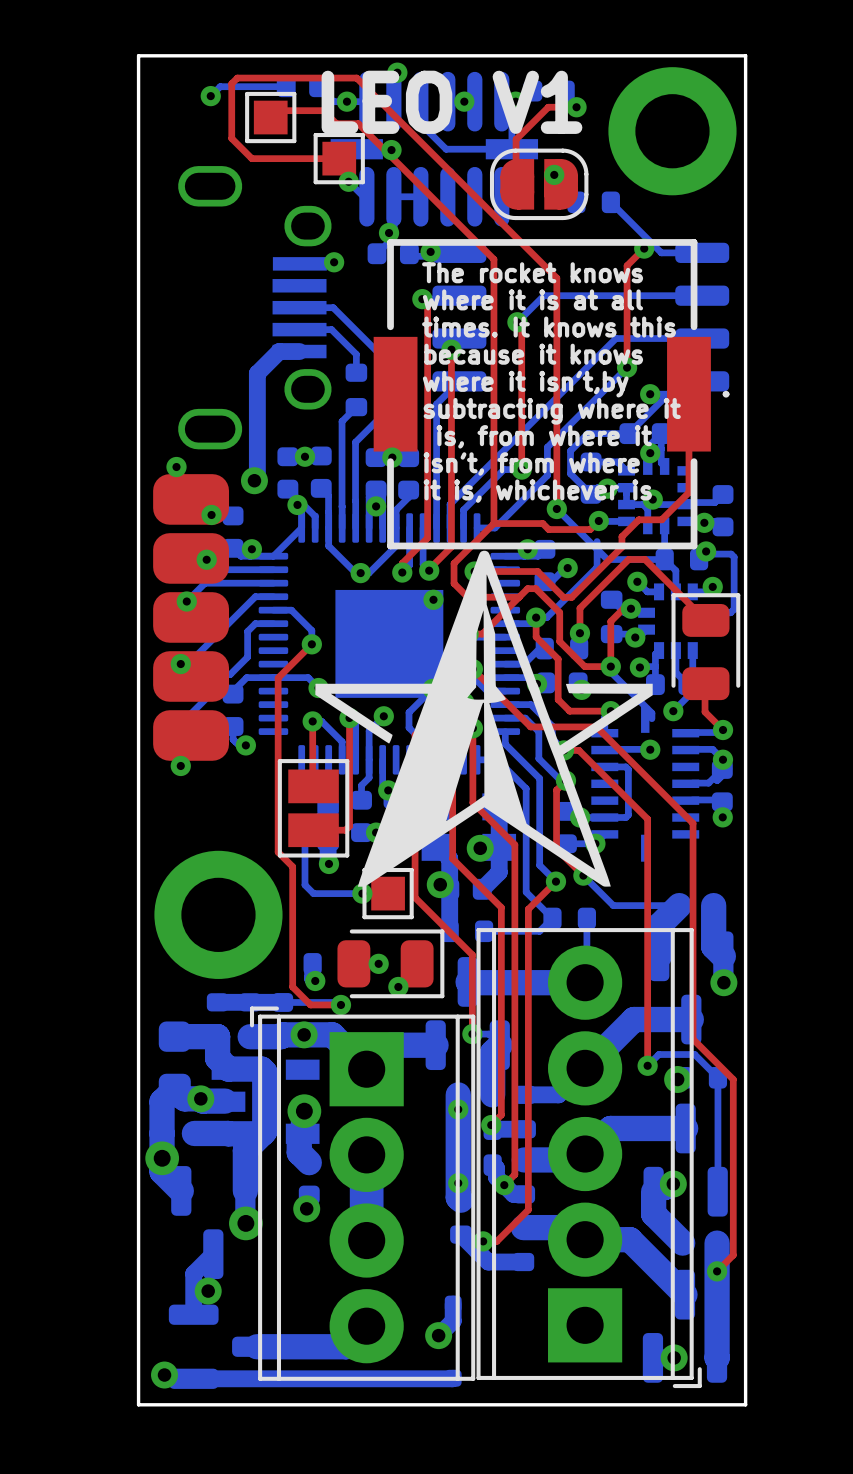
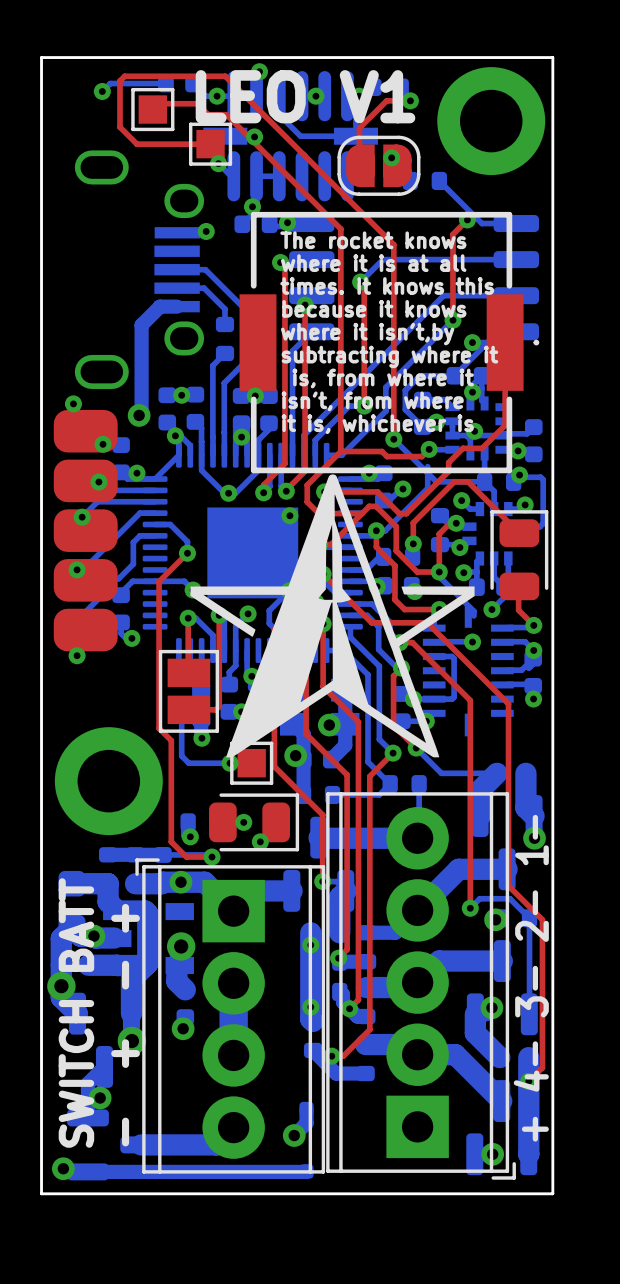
text: none -> + 4- 3- 2- 1- (531, 978)
text: none -> SWITCH BATT (76, 1013)
text: none -> - + - + (125, 1025)

